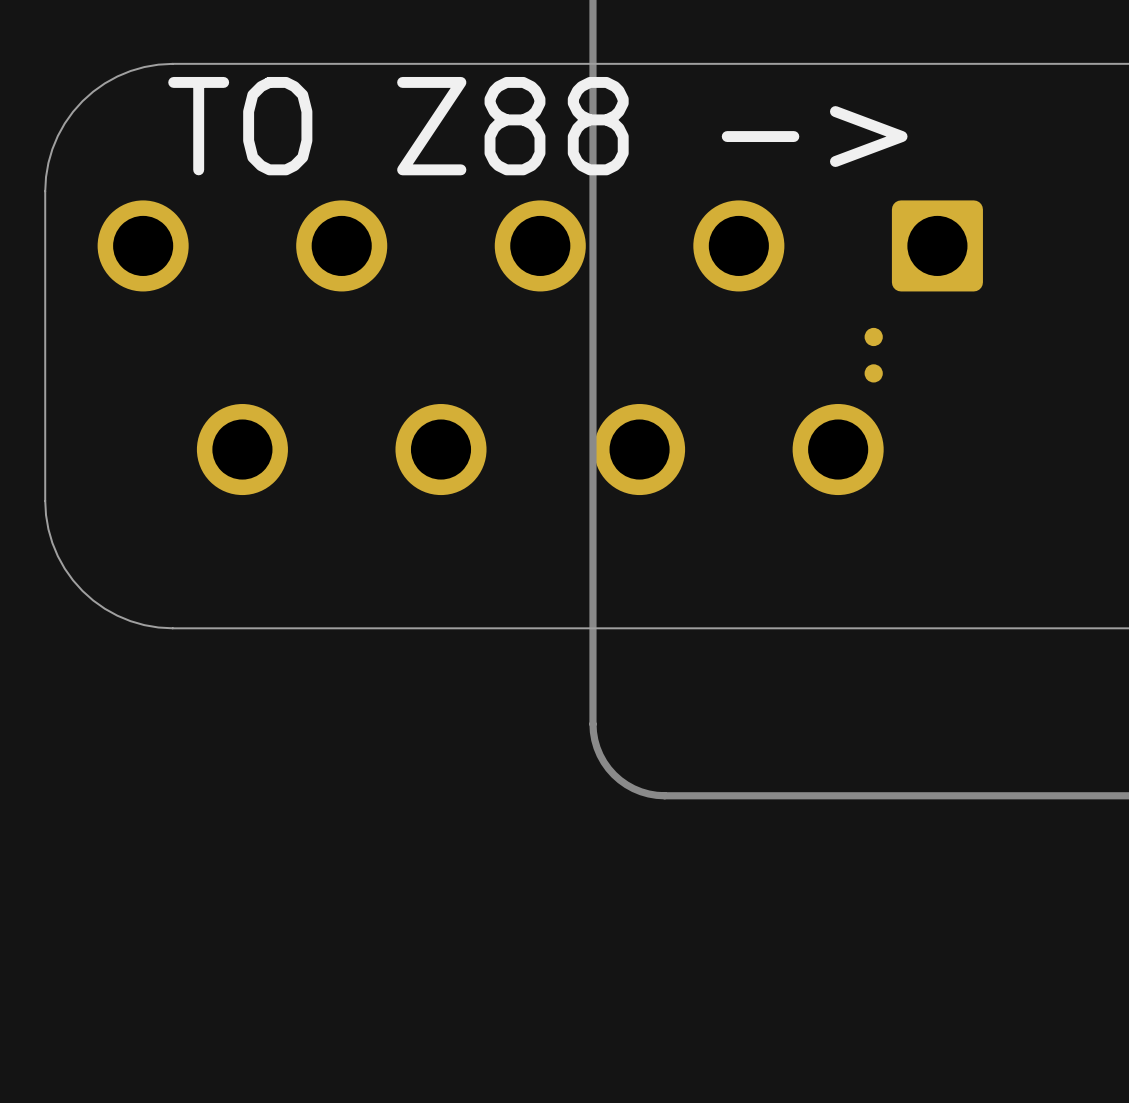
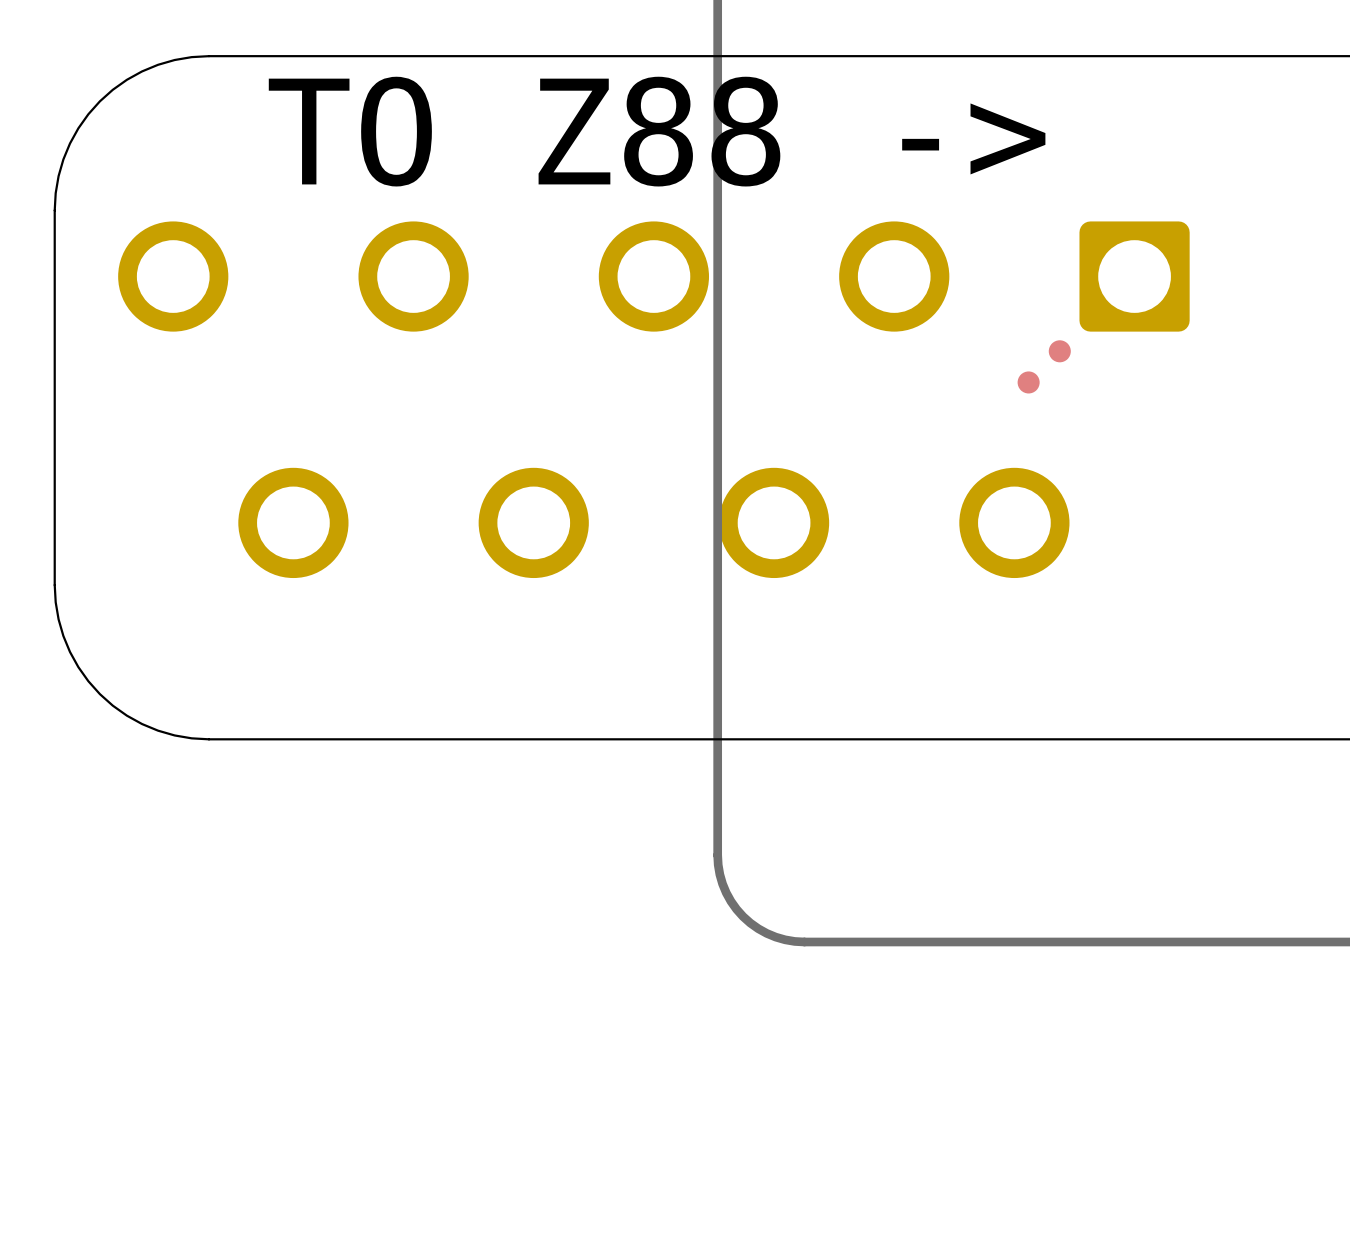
part rotation: 0° (873, 355) -> 45° clockwise (1044, 366)
part position: (873, 355) -> (1044, 366)

